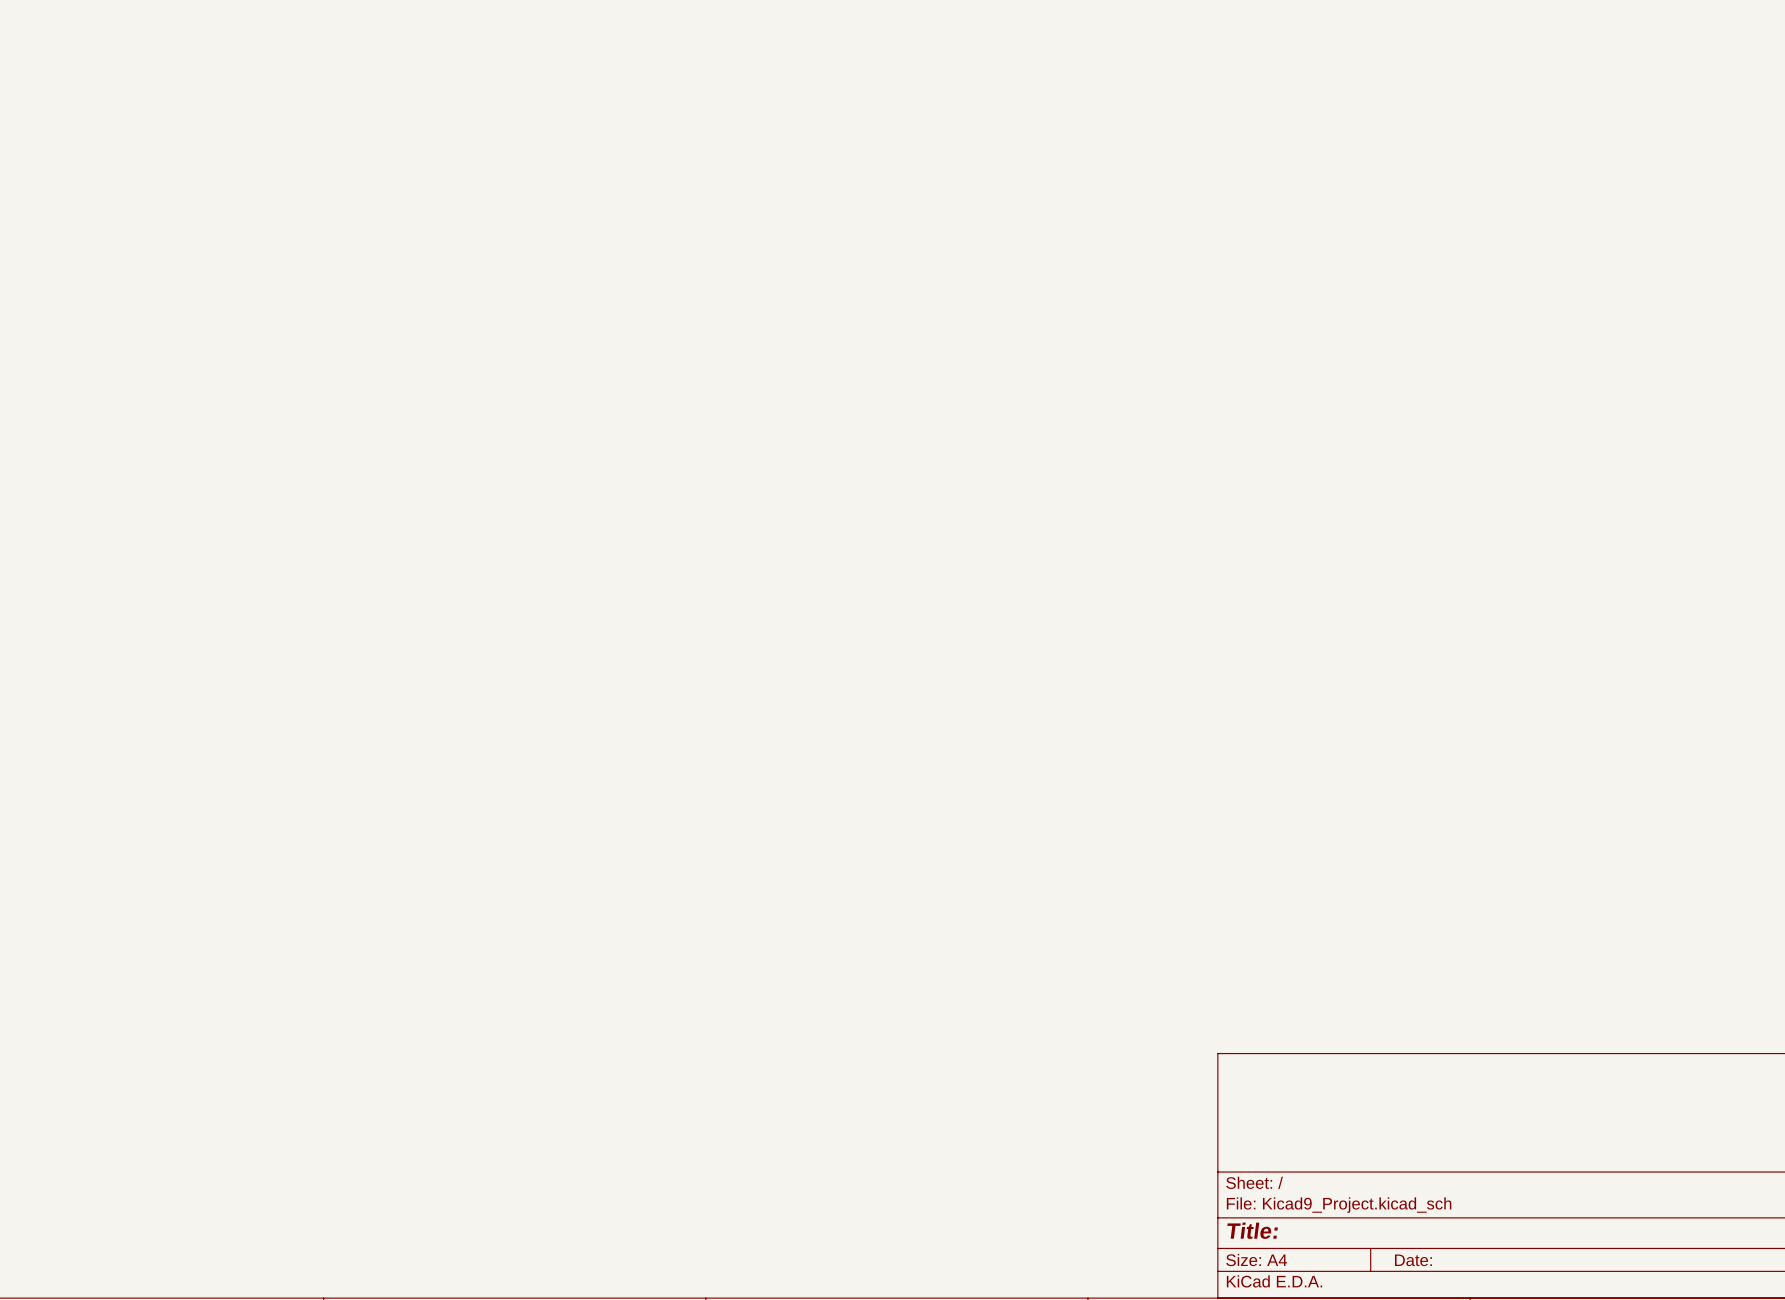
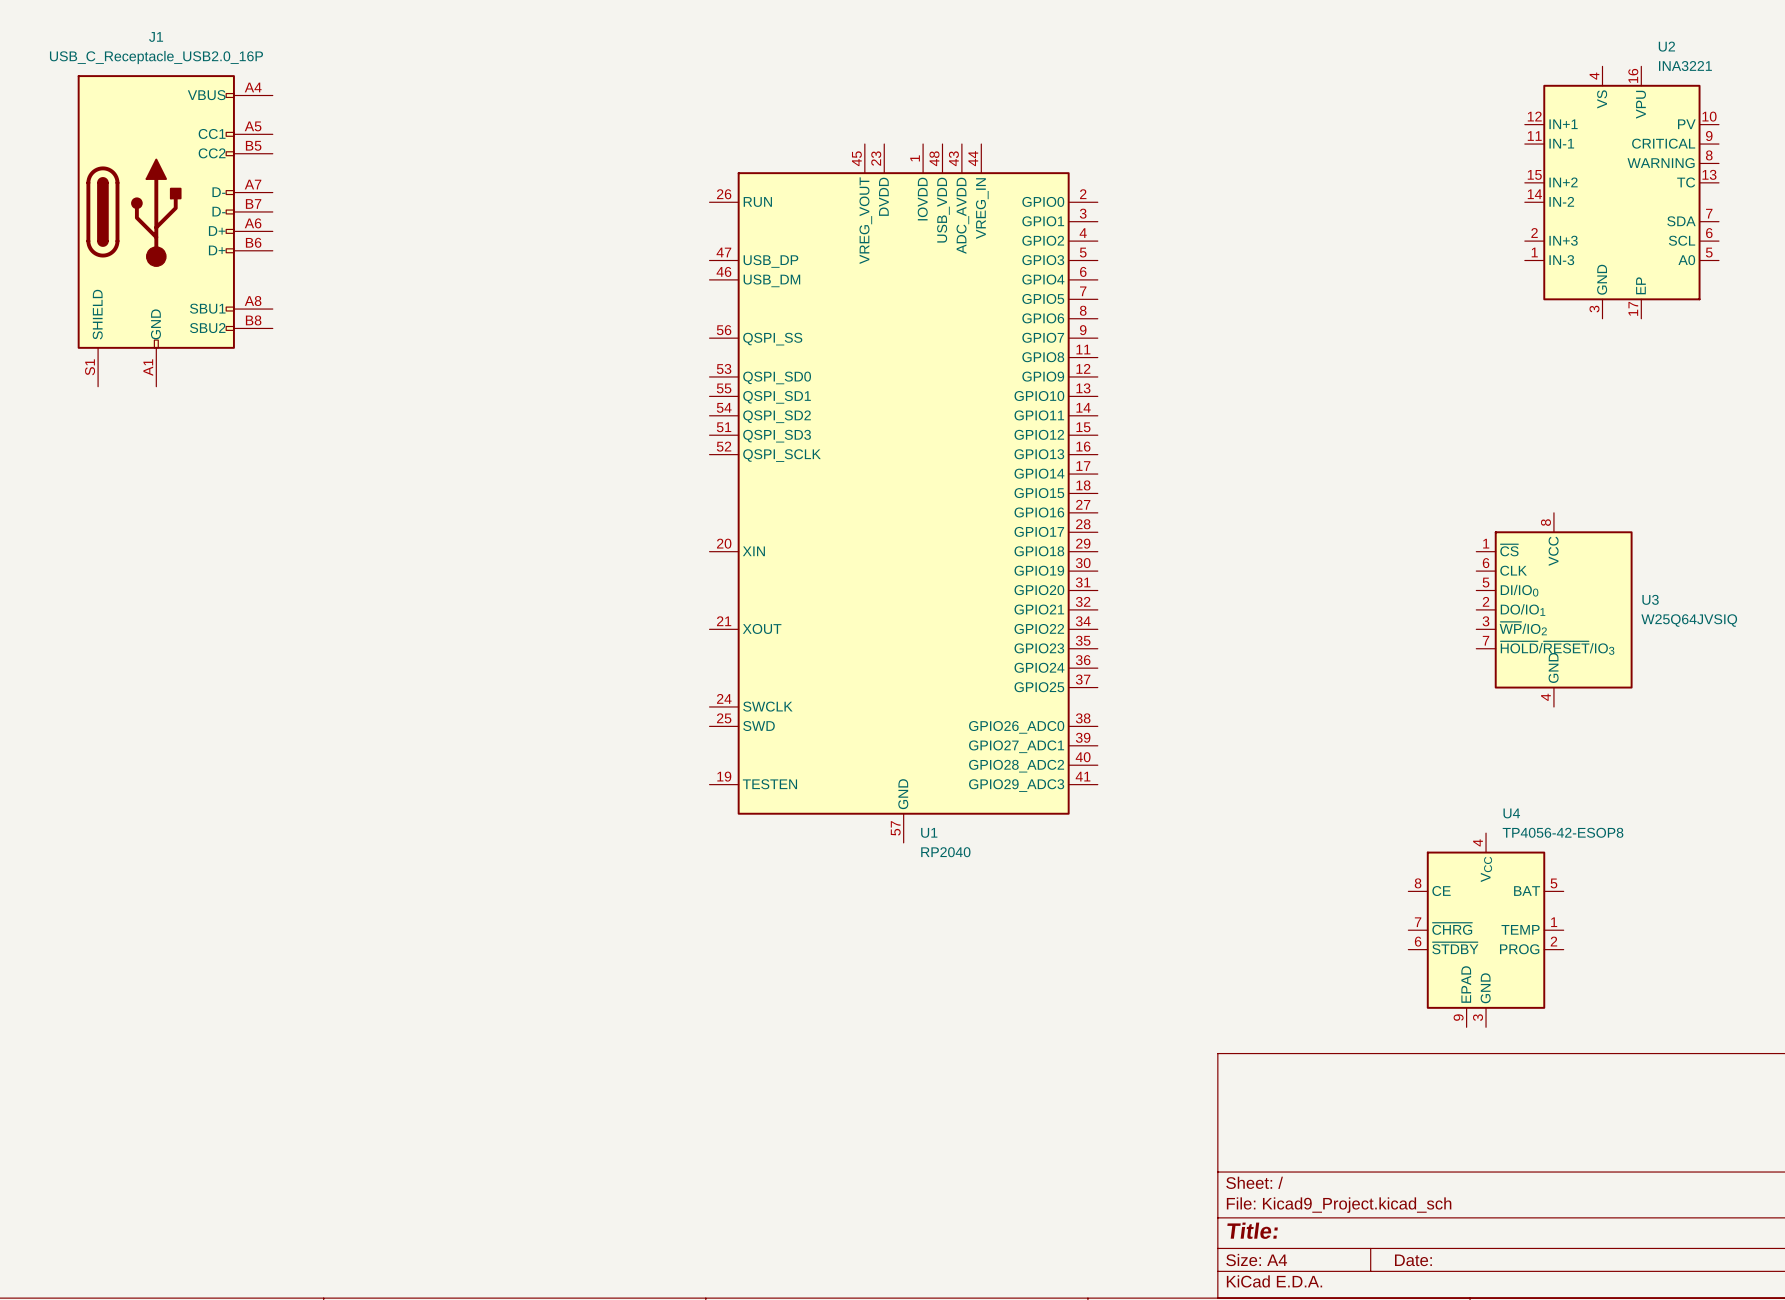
U2: none -> INA3221 (1621, 192)
J1: none -> USB_C_Receptacle_USB2.0_16P (175, 230)
U1: none -> RP2040 (903, 493)
U3: none -> W25Q64JVSIQ (1554, 609)
U4: none -> TP4056-42-ESOP8 (1486, 930)

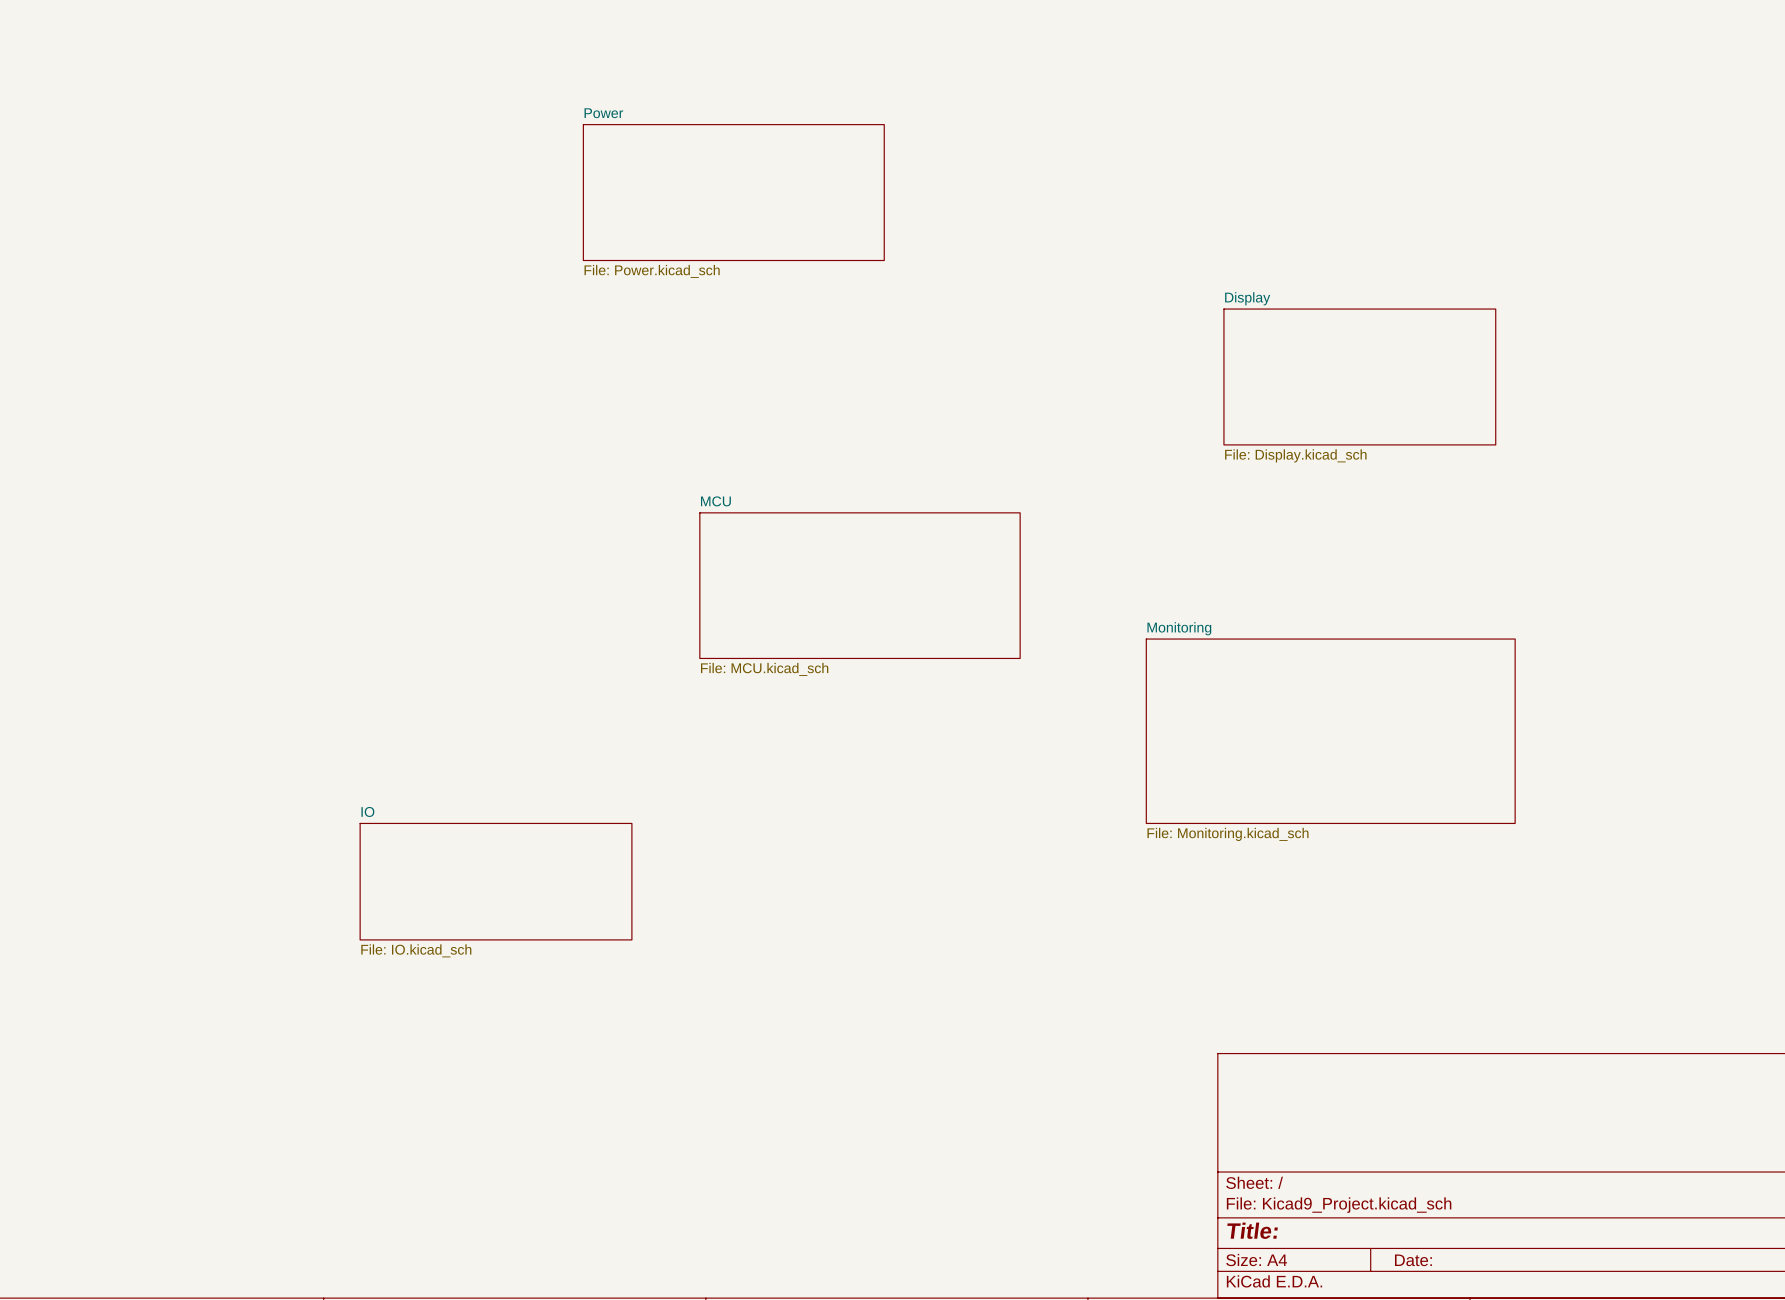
sheet Power: none -> File: Power.kicad_sch (733, 192)
U2: INA3221 (1621, 192) -> none
J1: USB_C_Receptacle_USB2.0_16P (175, 230) -> none
sheet Display: none -> File: Display.kicad_sch (1359, 376)
U1: RP2040 (903, 493) -> none
sheet MCU: none -> File: MCU.kicad_sch (859, 585)
U3: W25Q64JVSIQ (1554, 609) -> none
sheet Monitoring: none -> File: Monitoring.kicad_sch (1330, 731)
sheet IO: none -> File: IO.kicad_sch (496, 881)
U4: TP4056-42-ESOP8 (1486, 930) -> none

